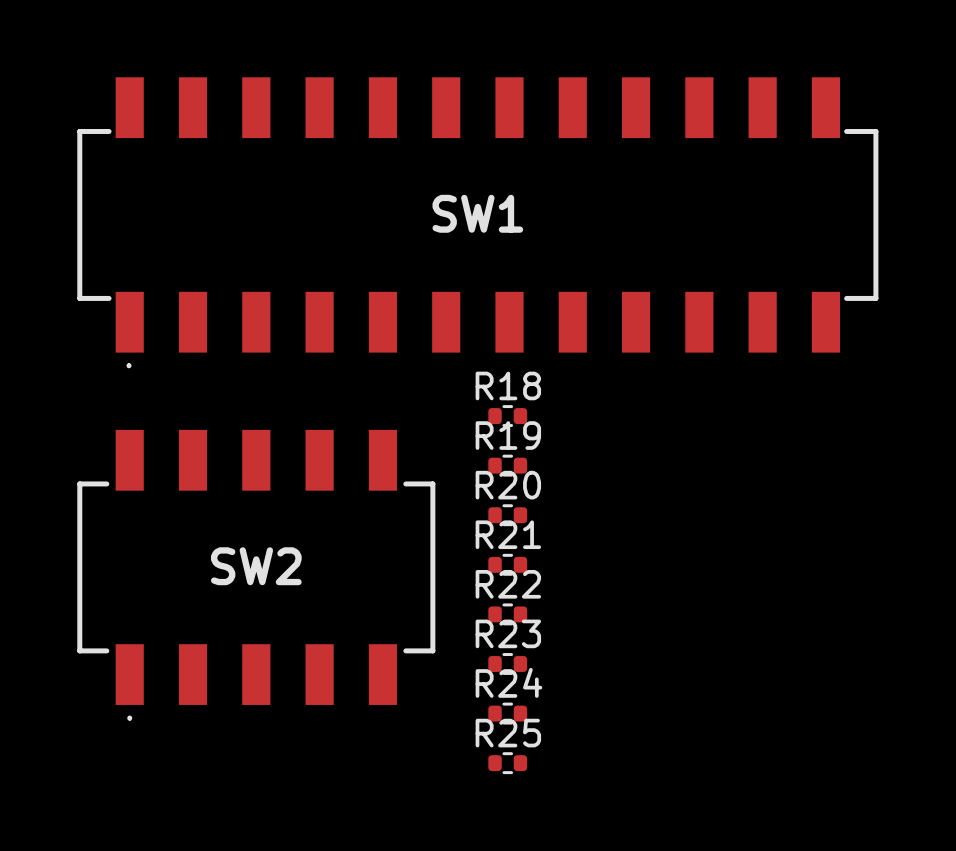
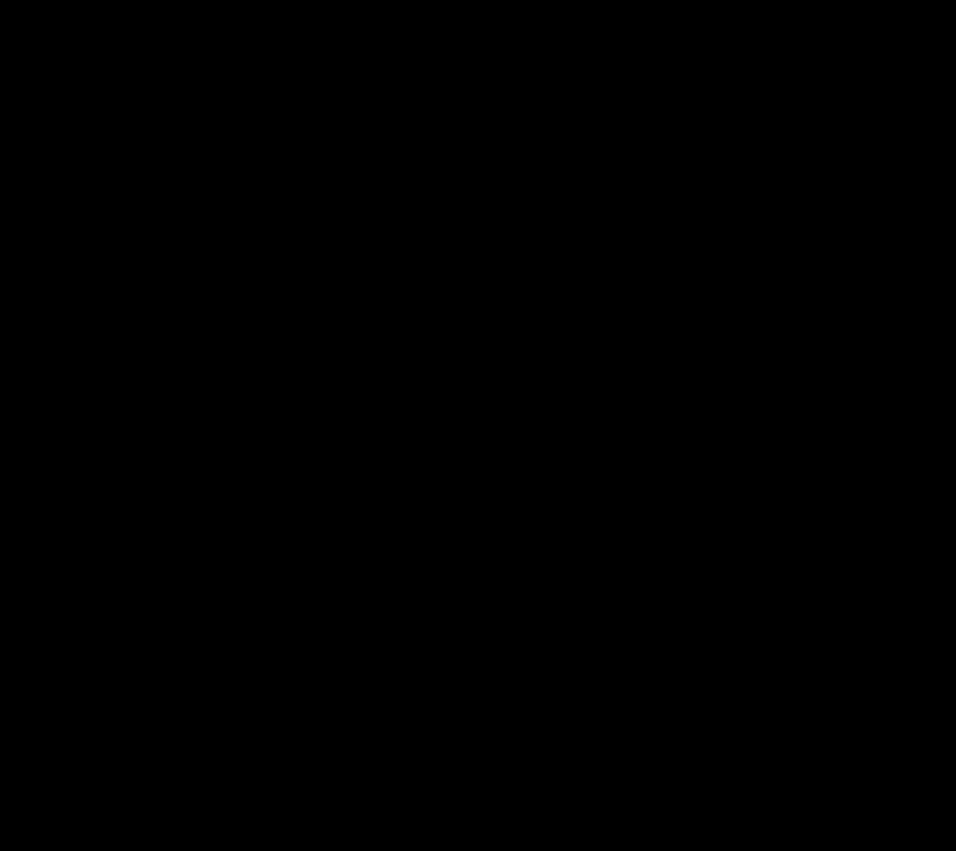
SW1: (477, 222) -> none
R18: (507, 416) -> none
R19: (507, 465) -> none
R20: (507, 515) -> none
R21: (507, 564) -> none
SW2: (256, 575) -> none
R22: (507, 614) -> none
R23: (507, 663) -> none
R24: (507, 713) -> none
R25: (507, 763) -> none

